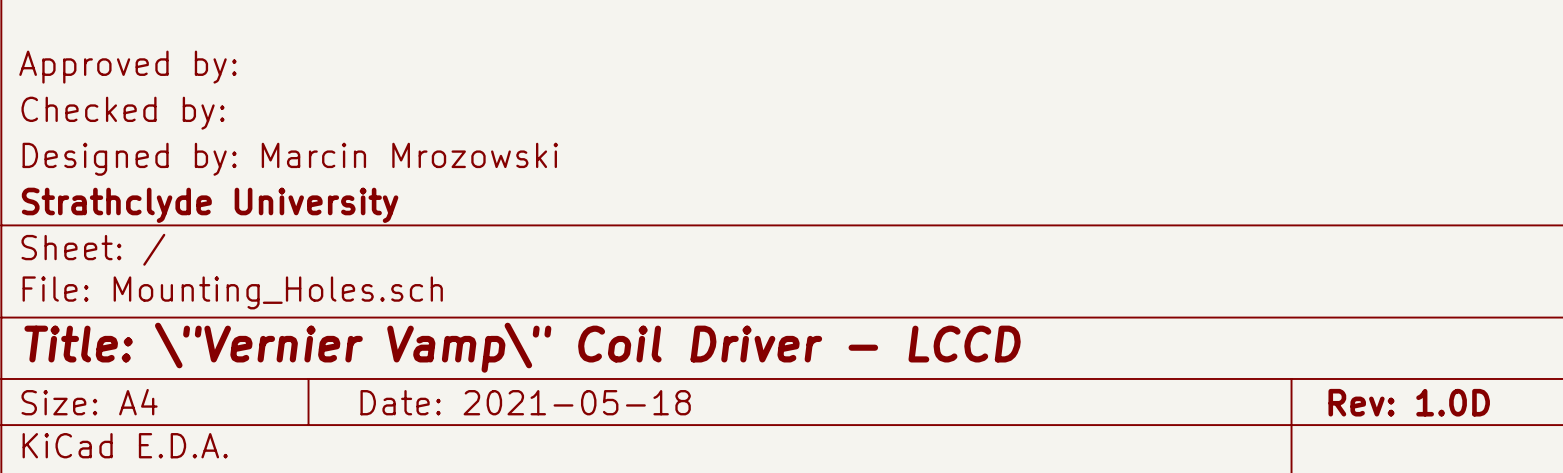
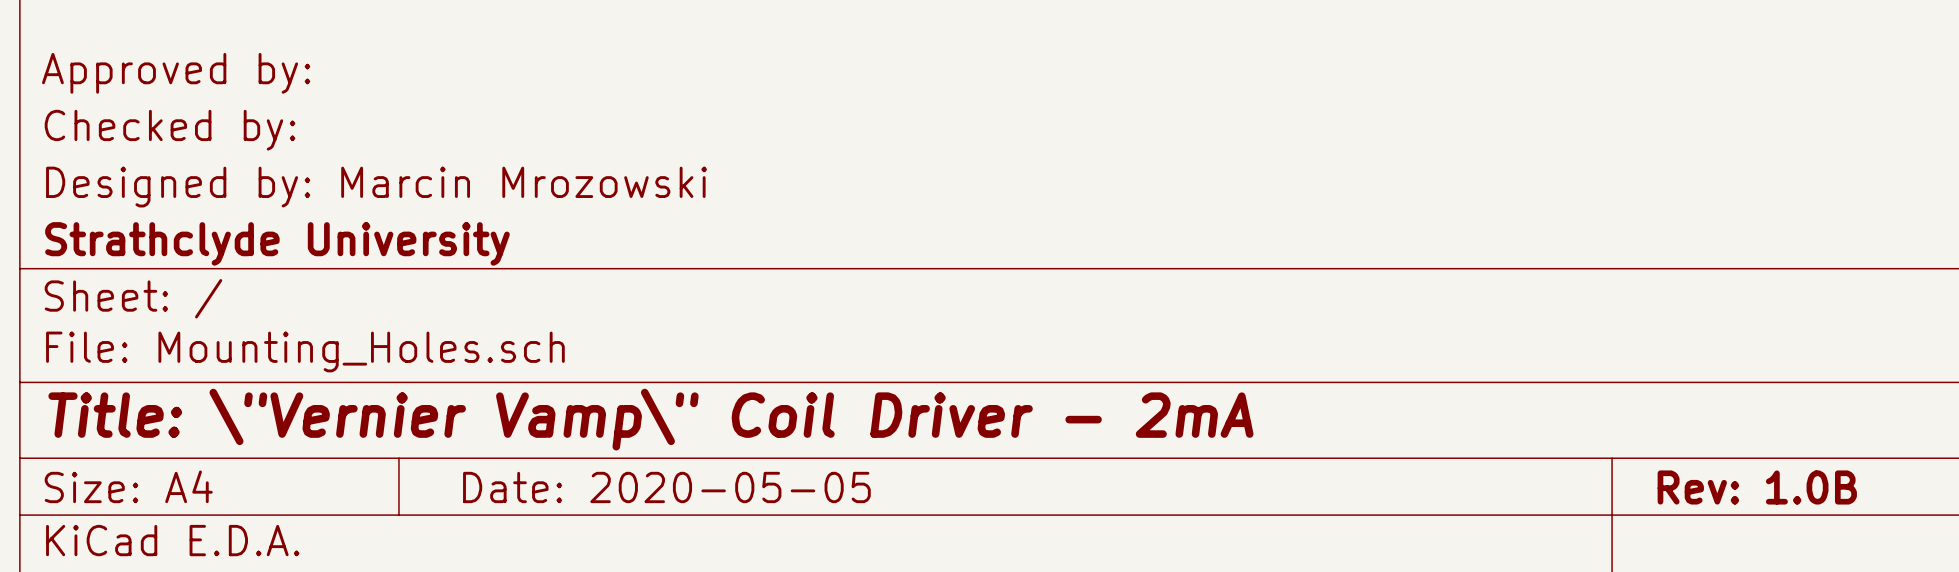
title block: Title: \"Vernier Vamp\" Coil Driver - LCCD (522, 347) -> Title: \"Vernier Vamp\" Coil Driver - 2mA (650, 419)
title block: Date: 2021-05-18 (525, 402) -> Date: 2020-05-05 (666, 487)
title block: Rev: 1.0D (1409, 402) -> Rev: 1.0B (1757, 487)

